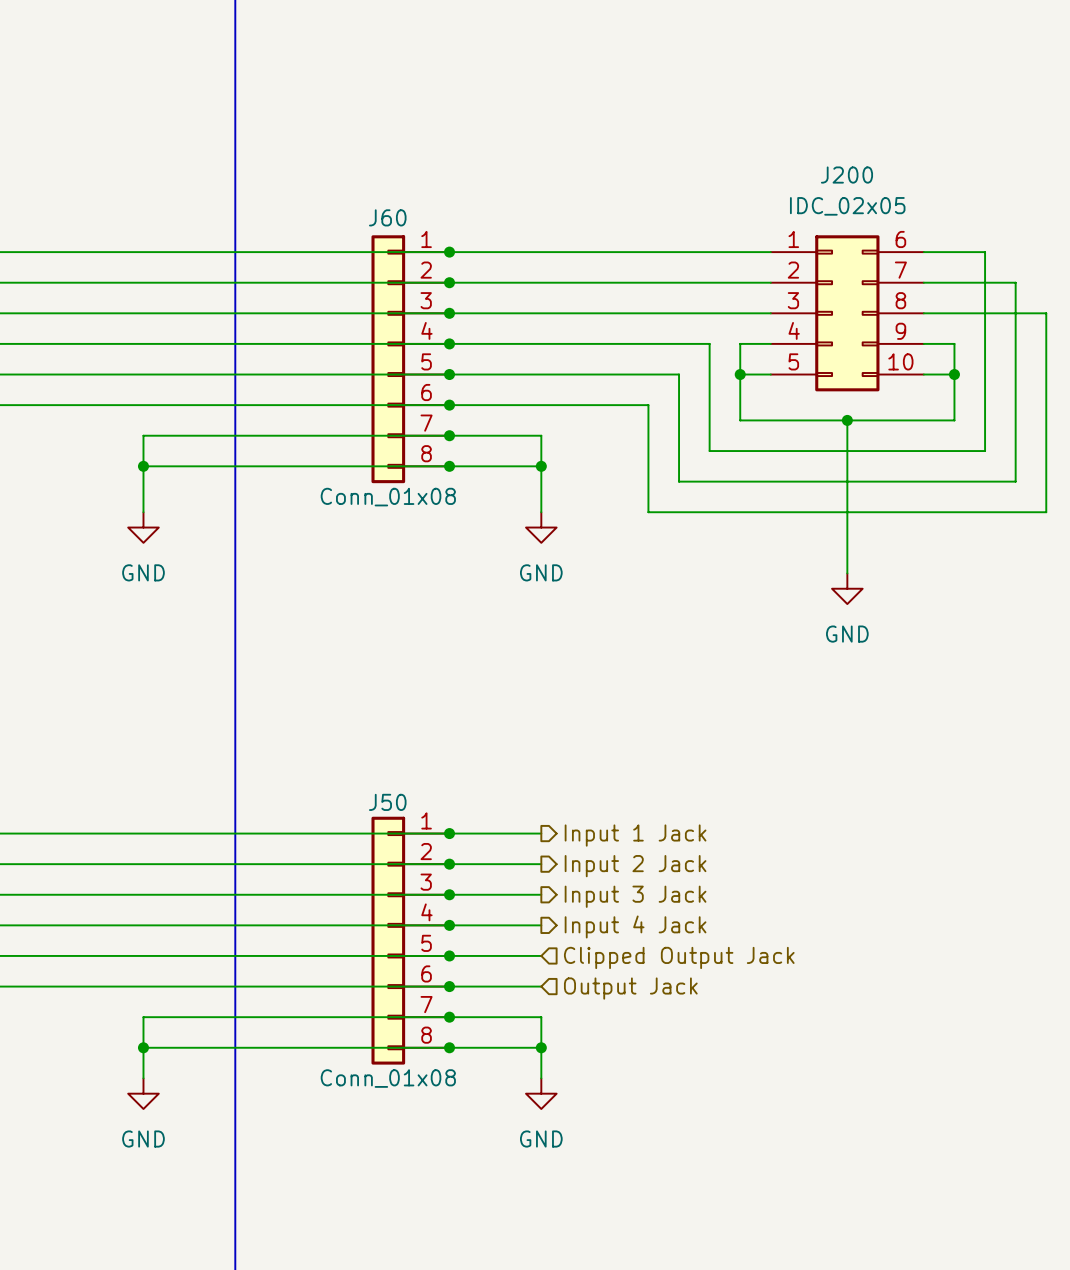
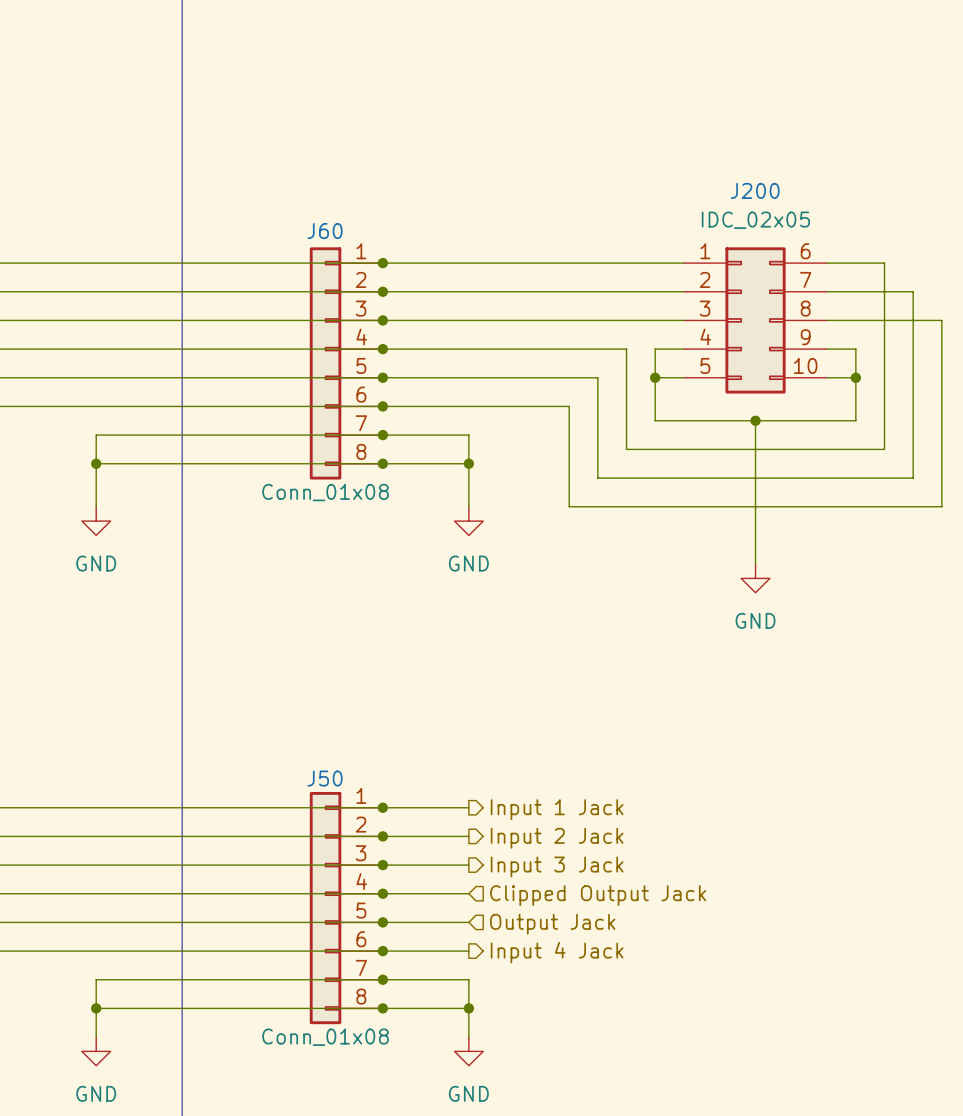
hierarchical label shape: output (635, 926) -> input (598, 895)
hierarchical label: Input 4 Jack (635, 926) -> Clipped Output Jack (598, 895)
hierarchical label: Clipped Output Jack (679, 957) -> Output Jack (552, 924)
hierarchical label shape: input (630, 988) -> output (557, 952)
hierarchical label: Output Jack (630, 988) -> Input 4 Jack (557, 952)

